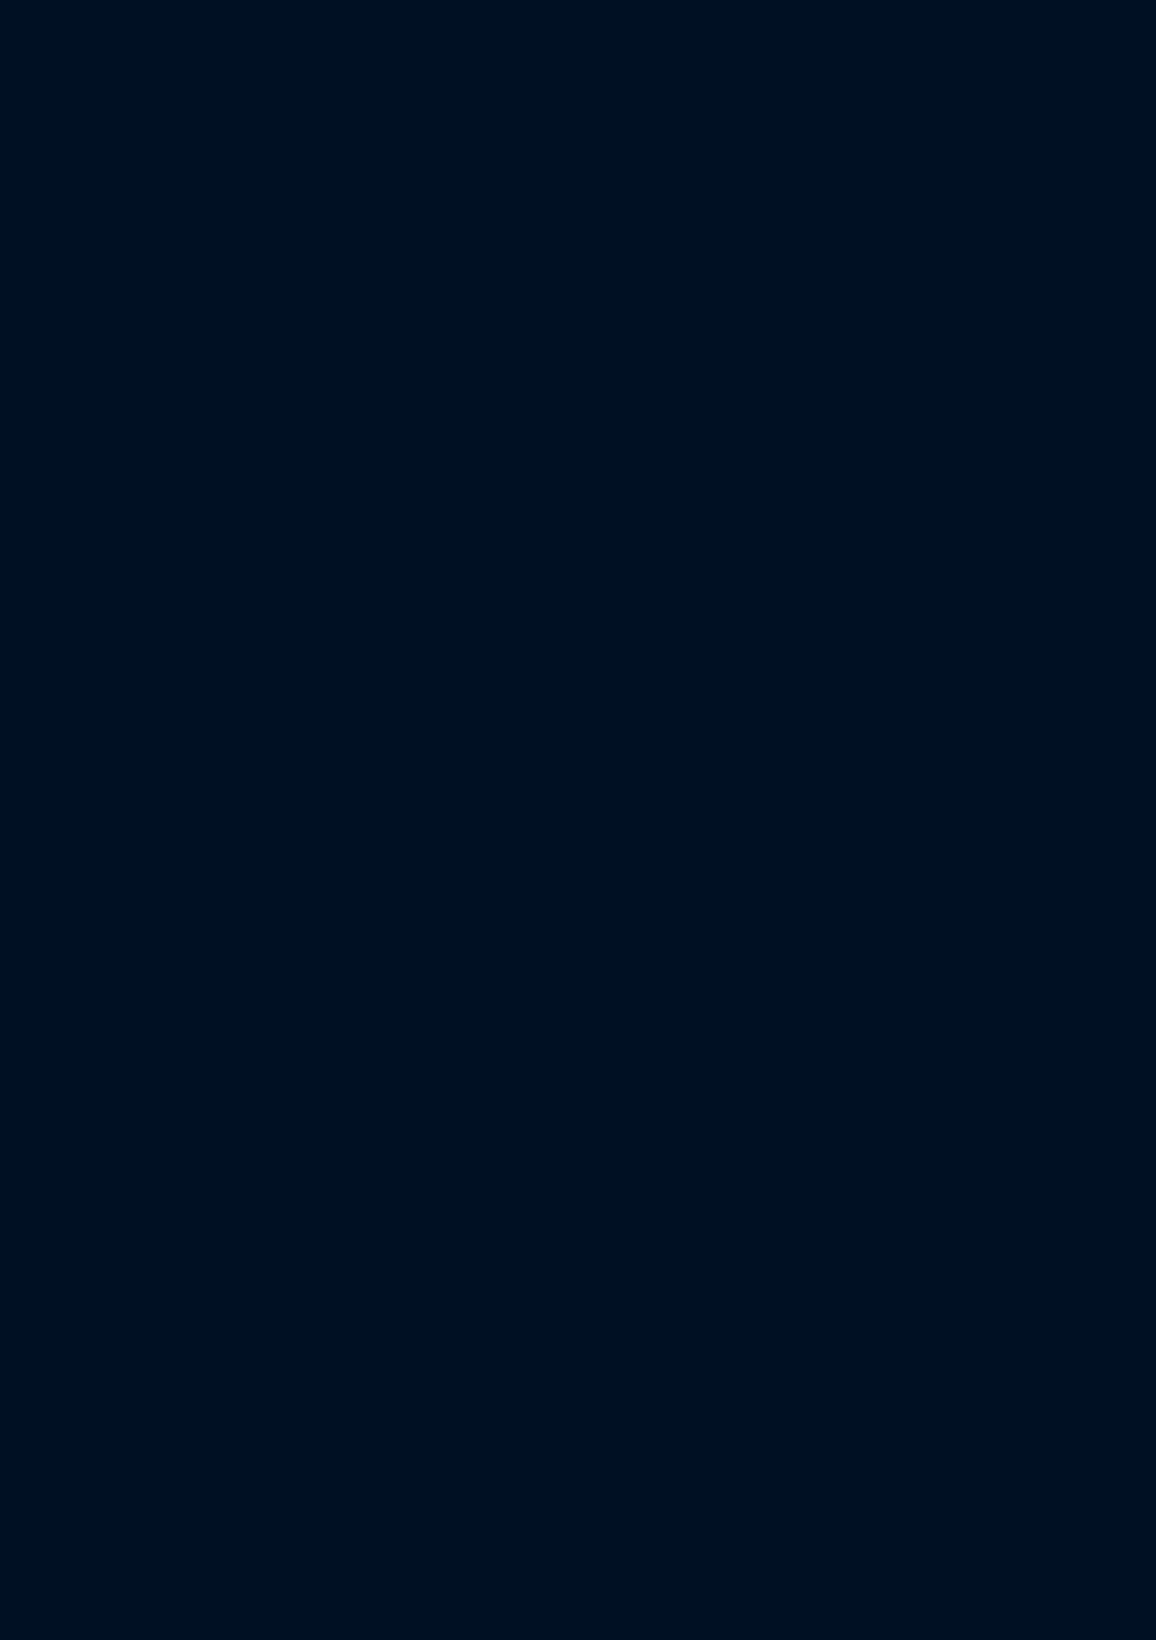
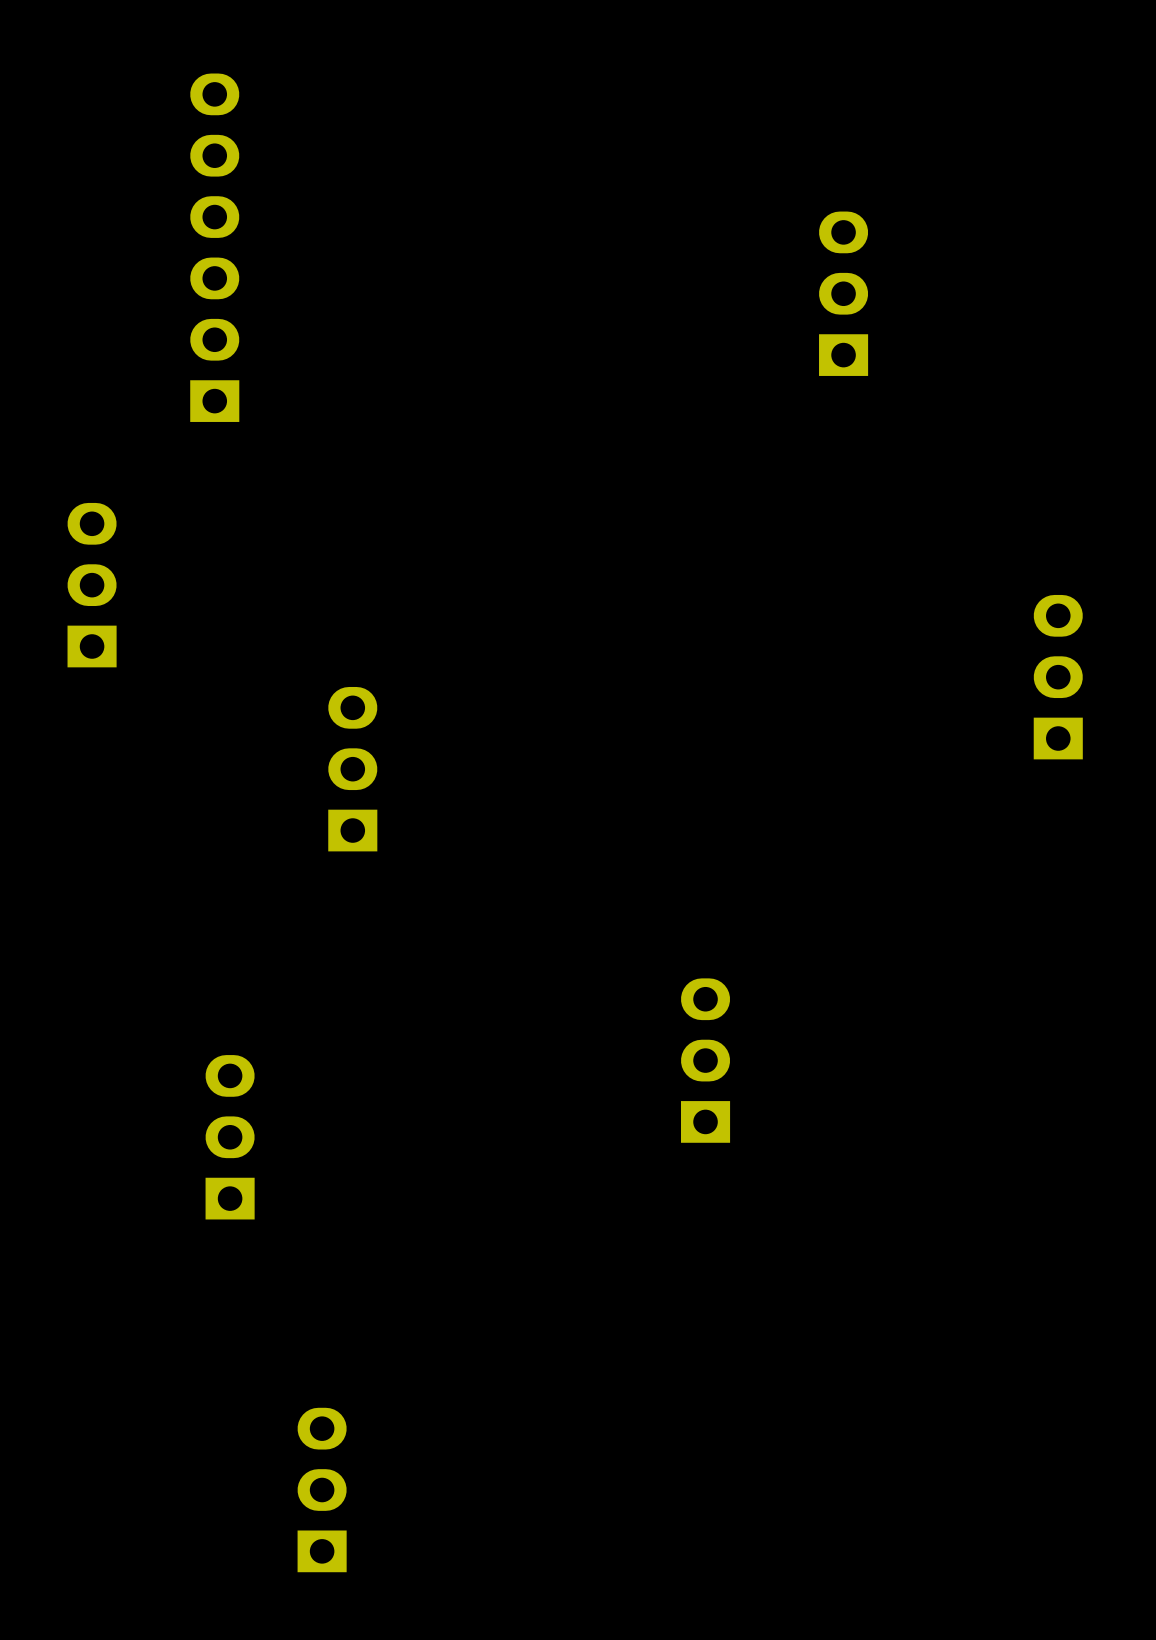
part: none -> (214, 247)
part: none -> (843, 293)
part: none -> (92, 585)
part: none -> (1058, 677)
part: none -> (352, 769)
part: none -> (705, 1060)
part: none -> (230, 1137)
part: none -> (322, 1490)

